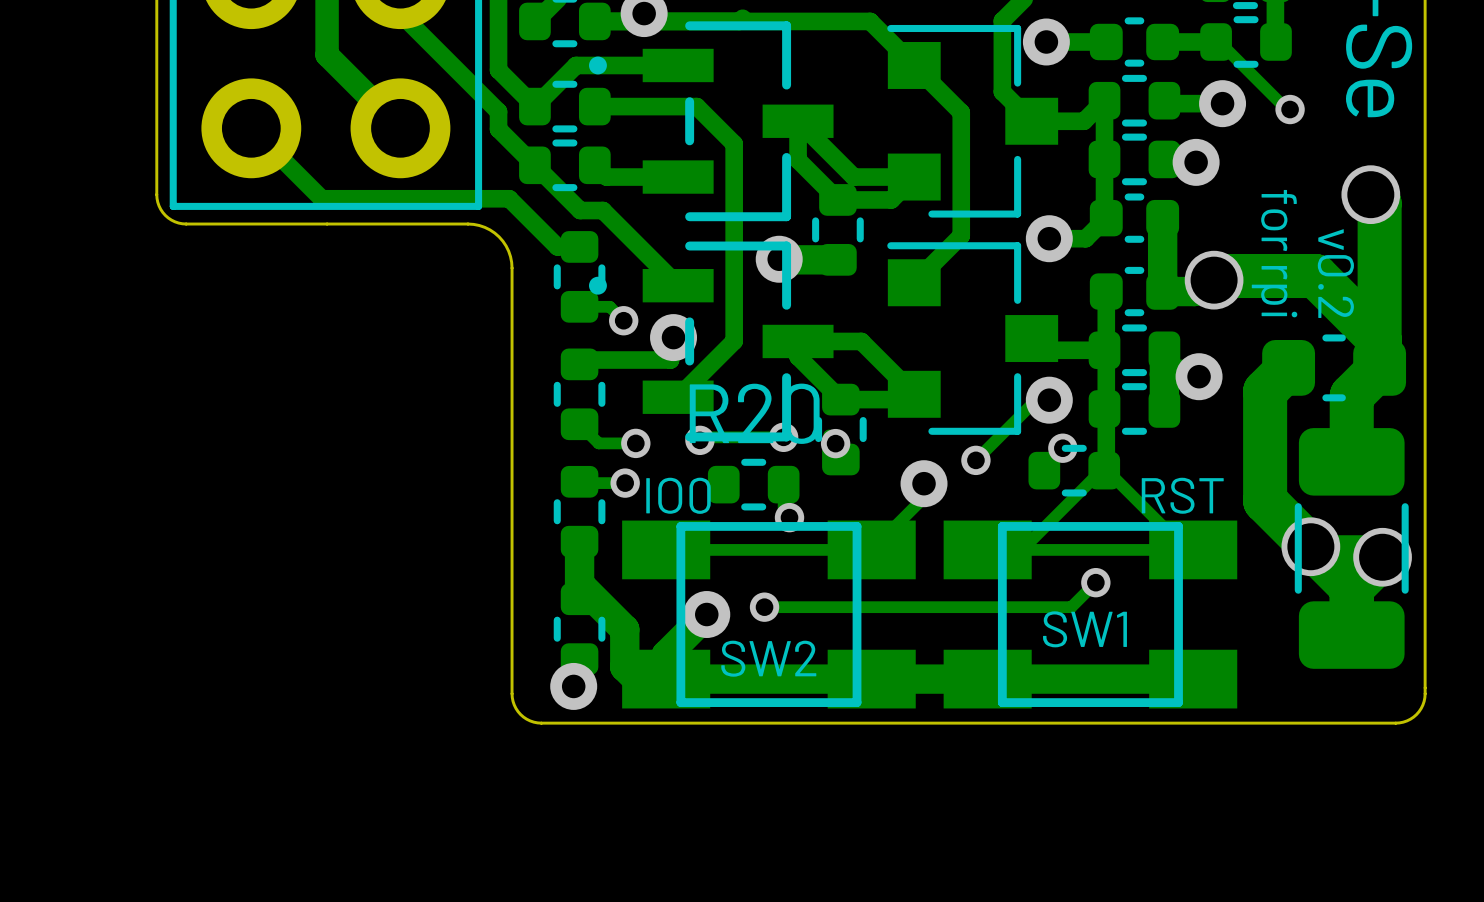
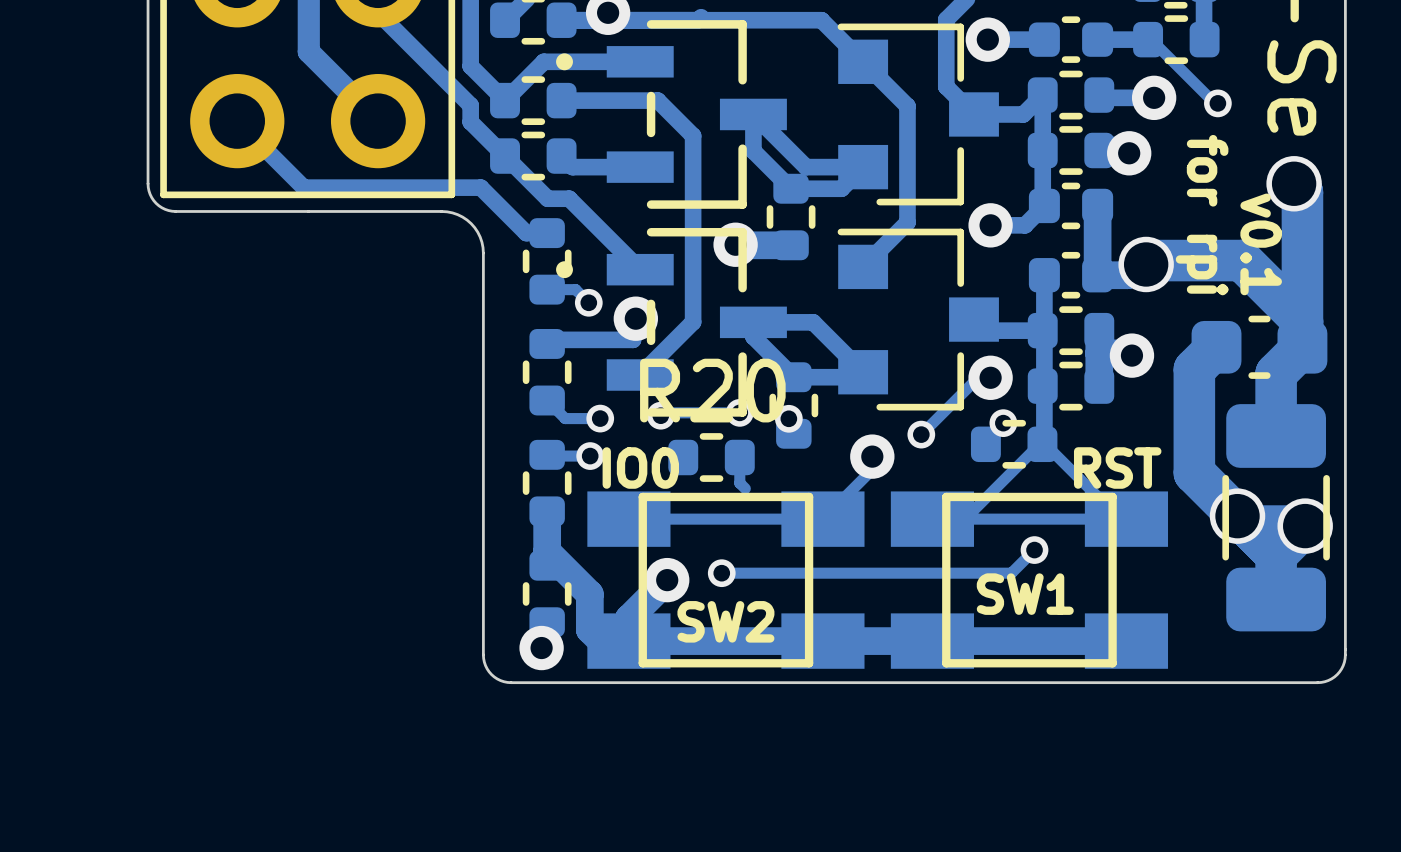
text: v0.2 (1335, 273) -> v0.1 (1261, 244)
via: (789, 517) -> none

